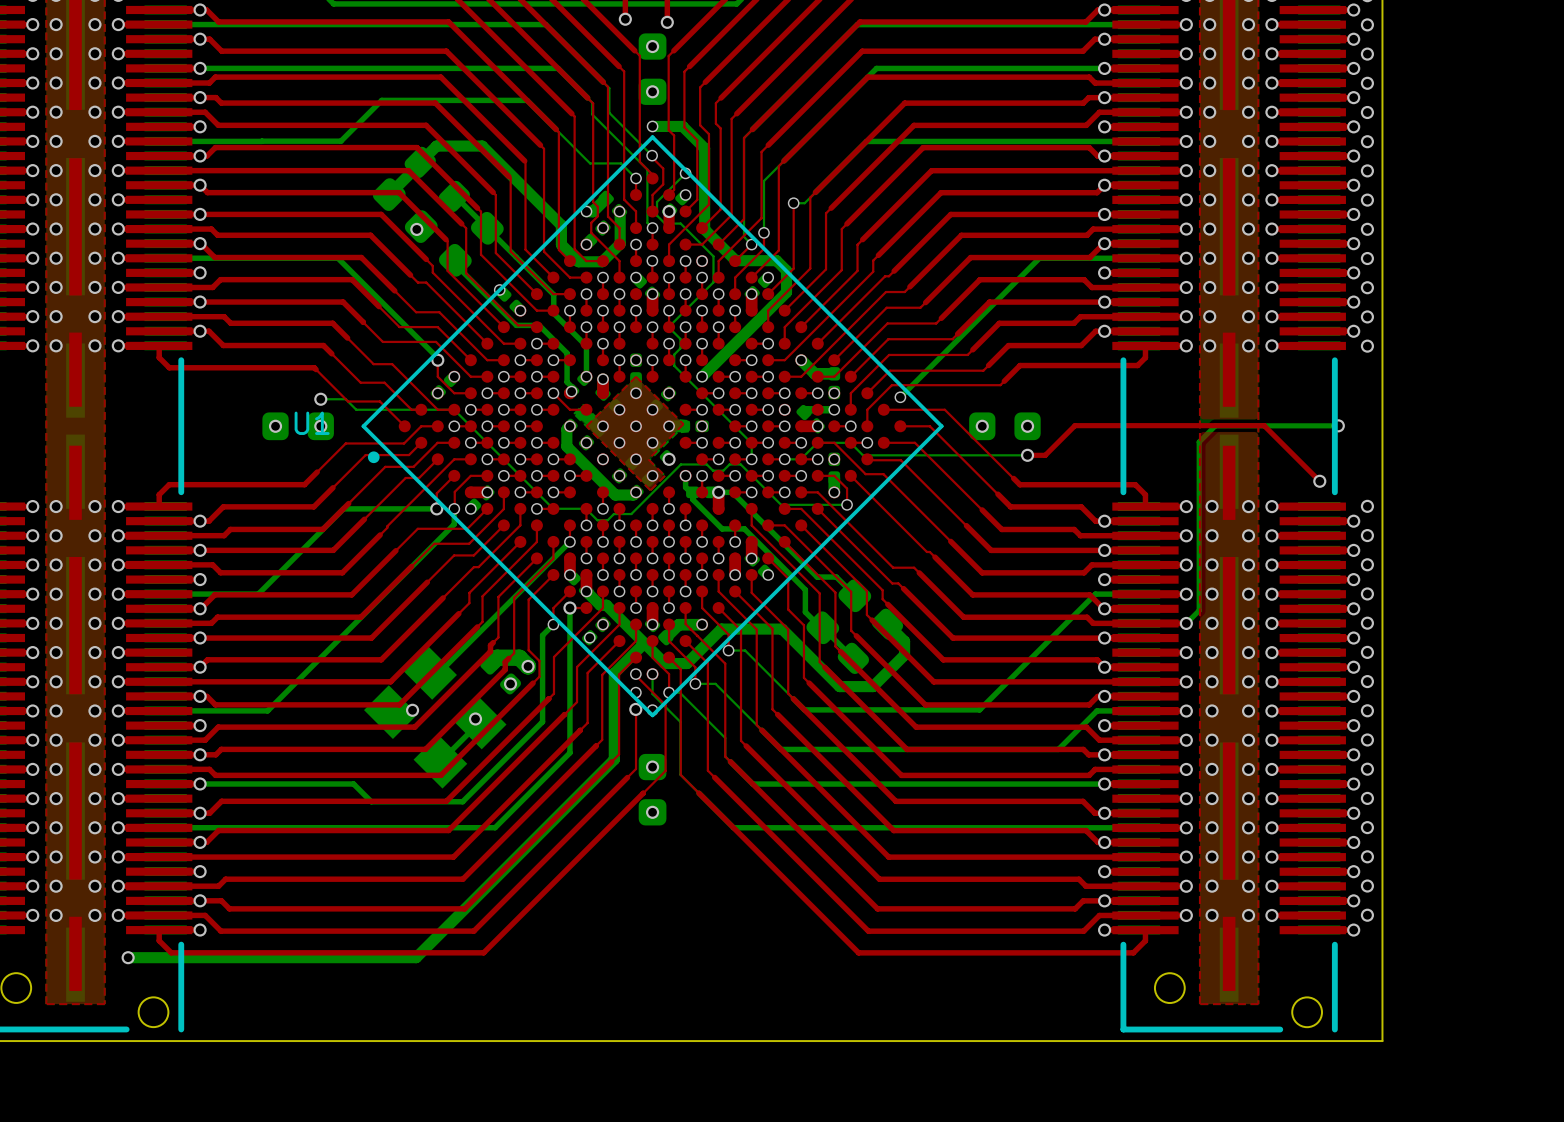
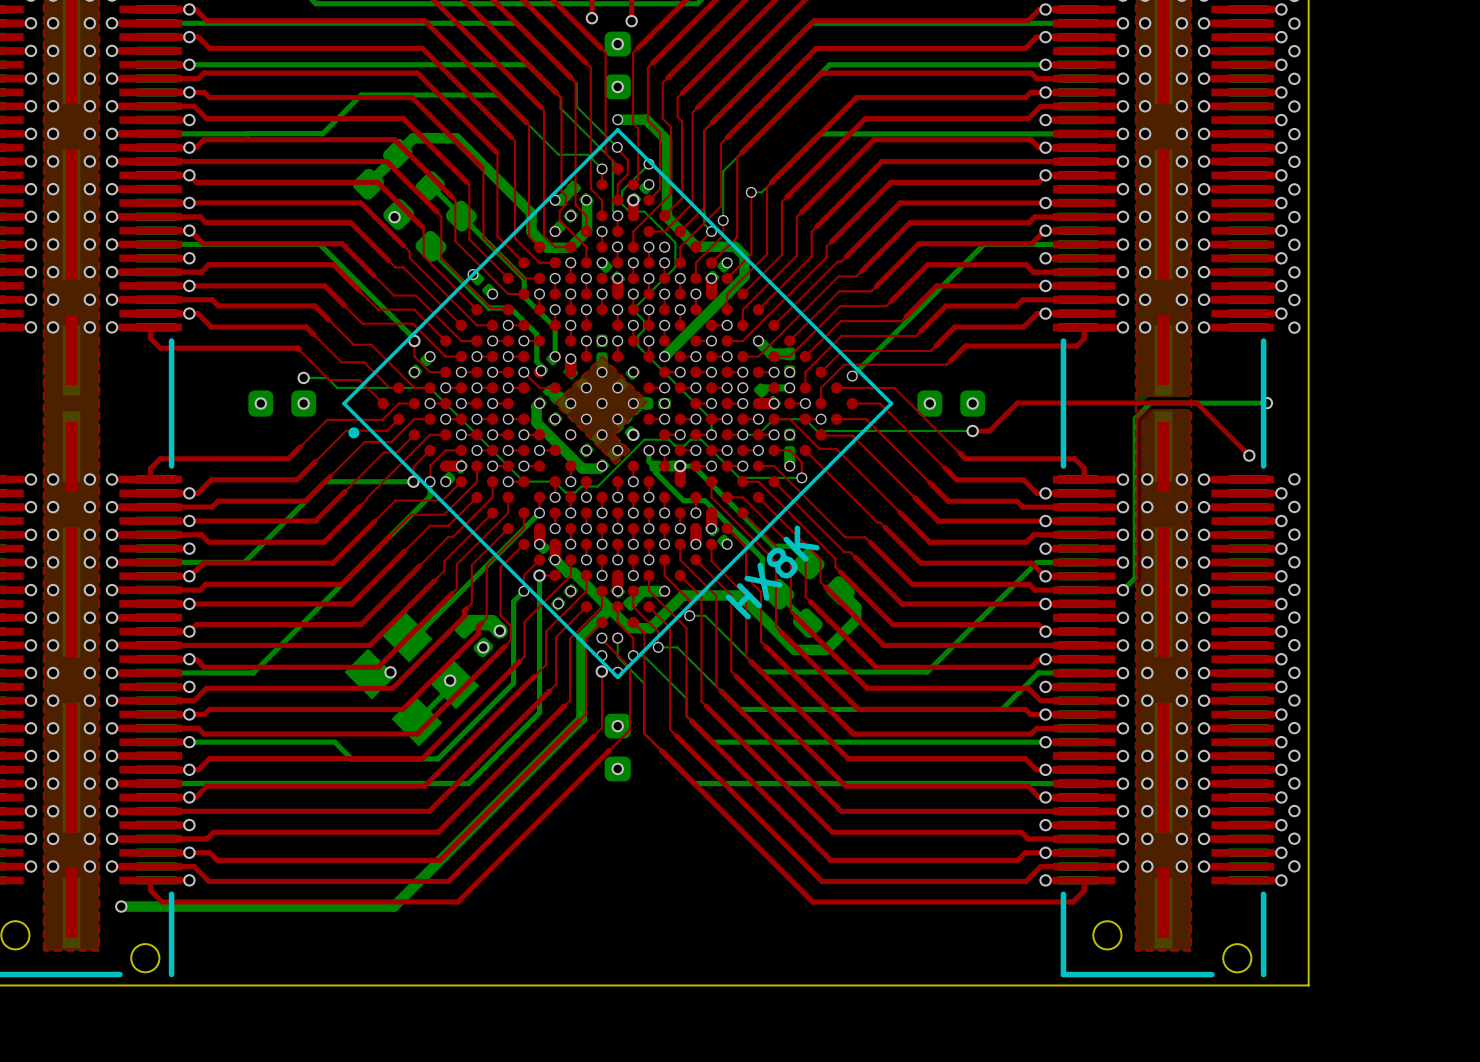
U1 name: U1 (312, 423) -> none
text: none -> HX8K (772, 572)

